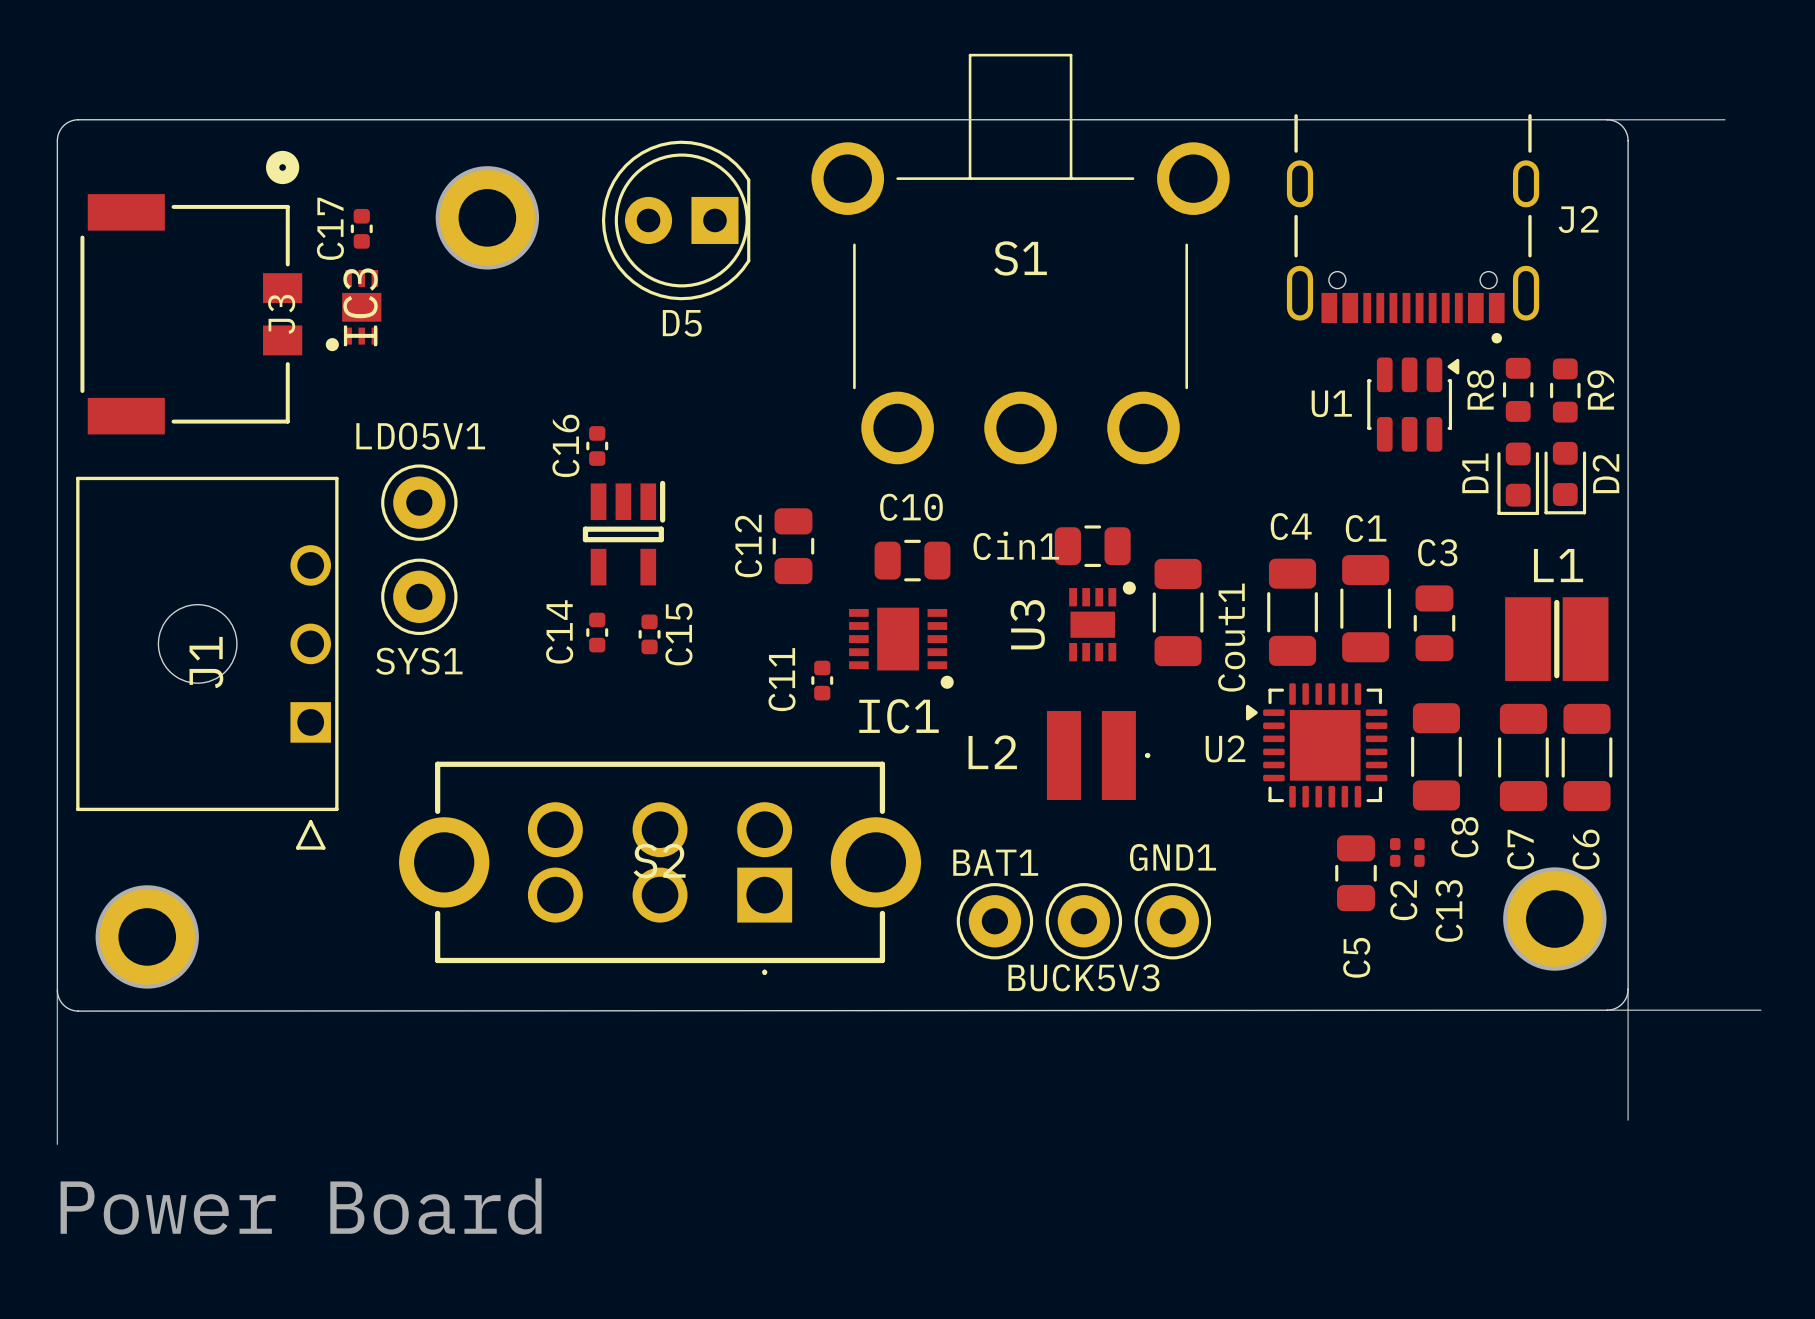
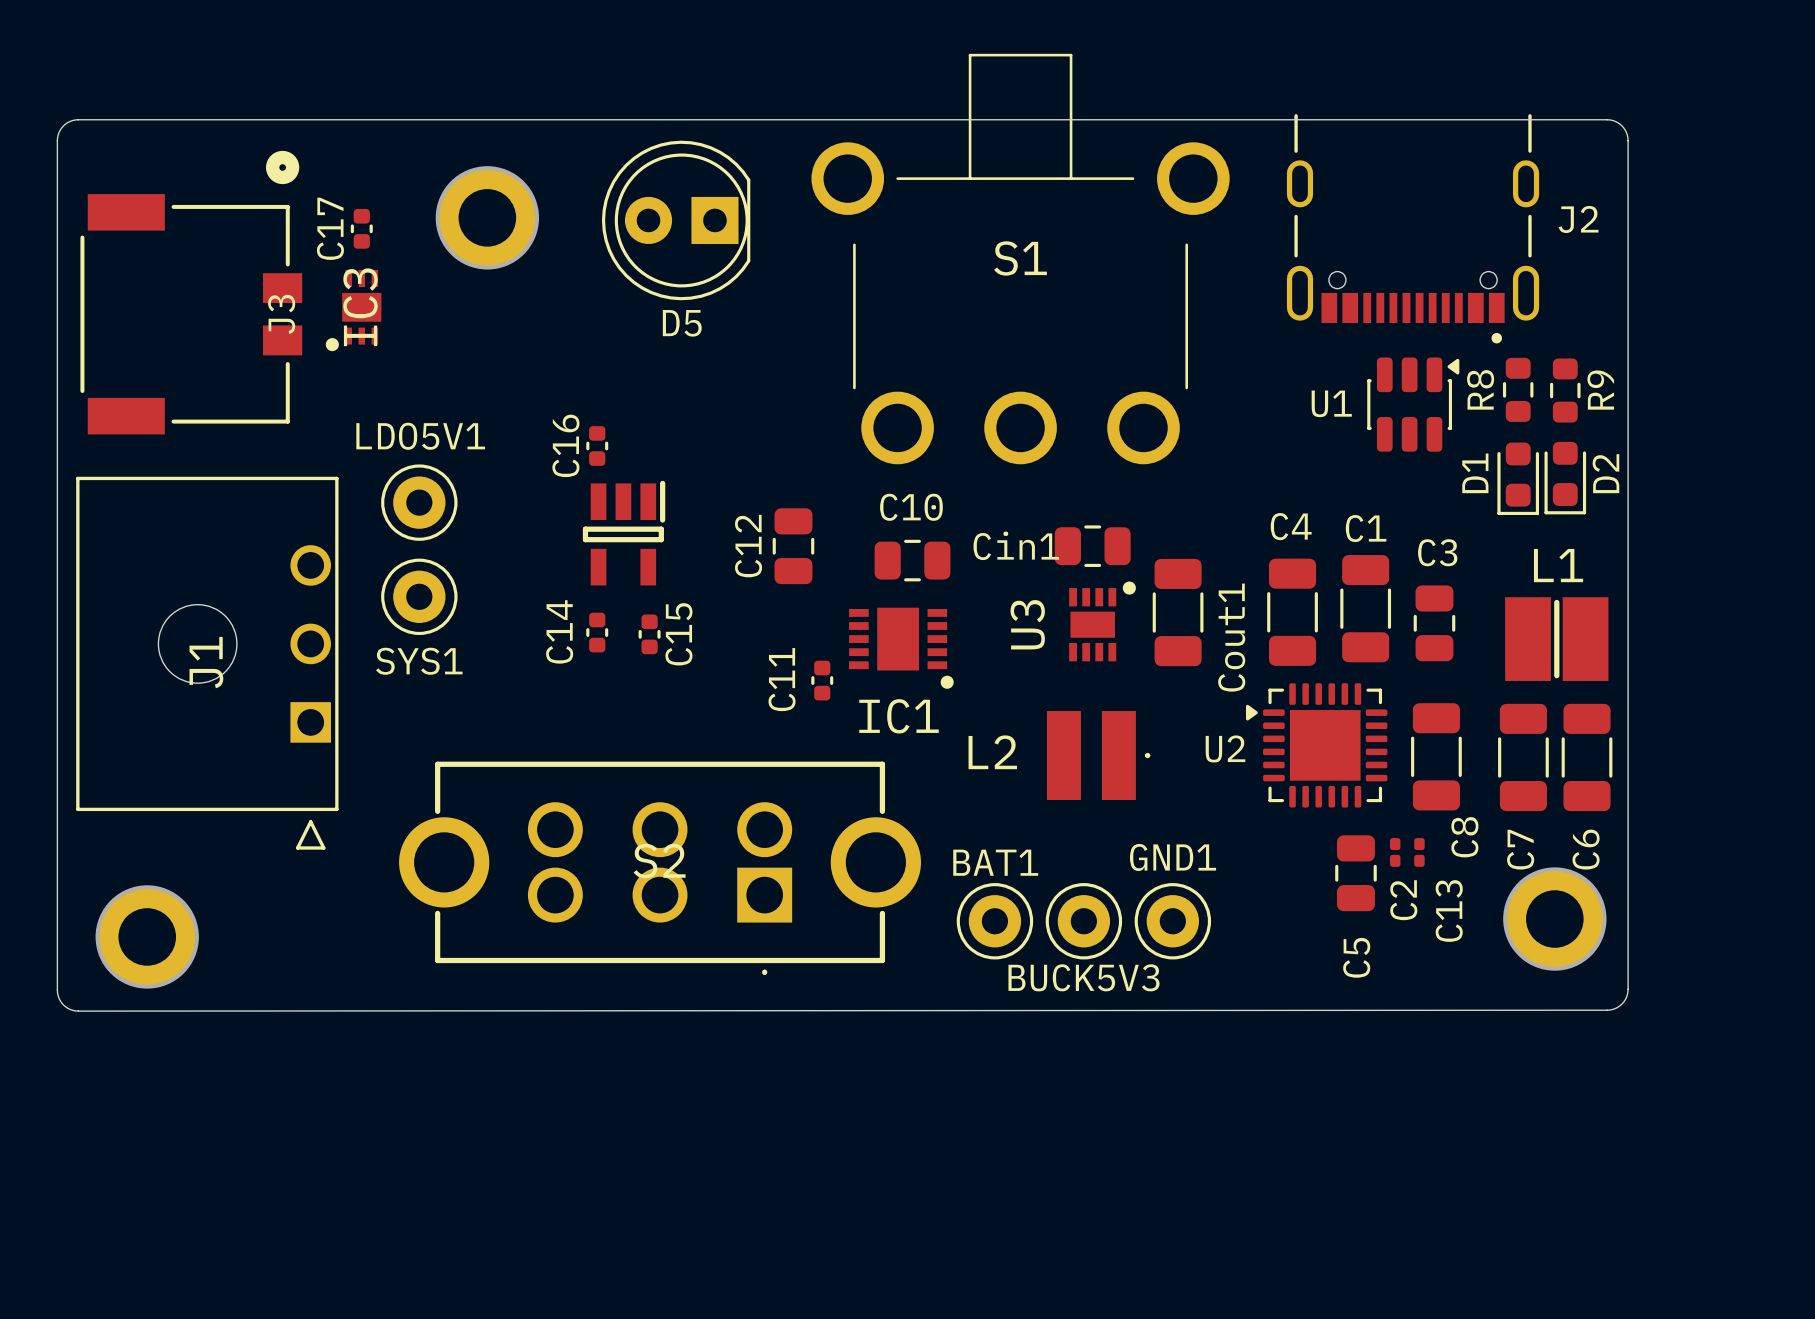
line: (1607, 119) (1724, 119) -> none
line: (1628, 989) (1628, 1120) -> none
line: (57, 990) (57, 1144) -> none
line: (1607, 1010) (1760, 1010) -> none
text: Power Board (301, 1206) -> none

